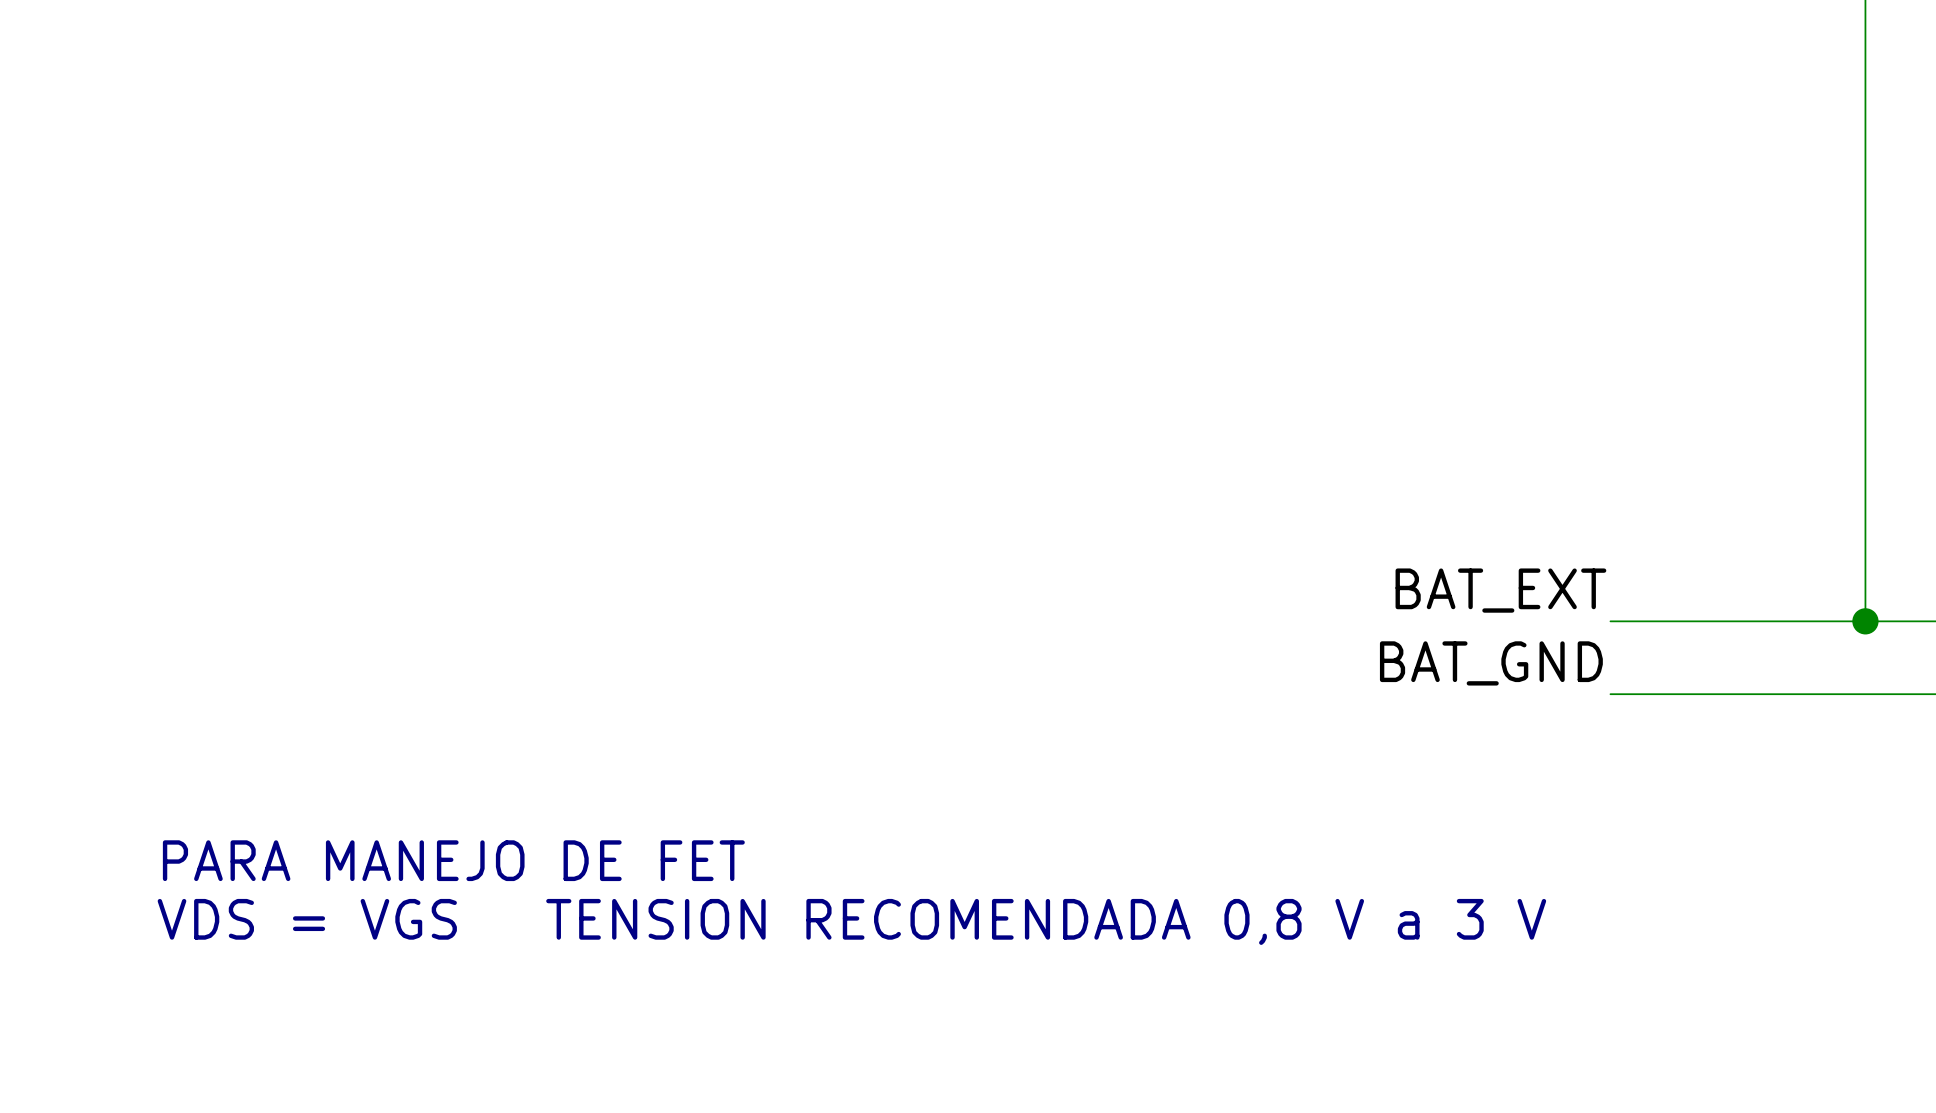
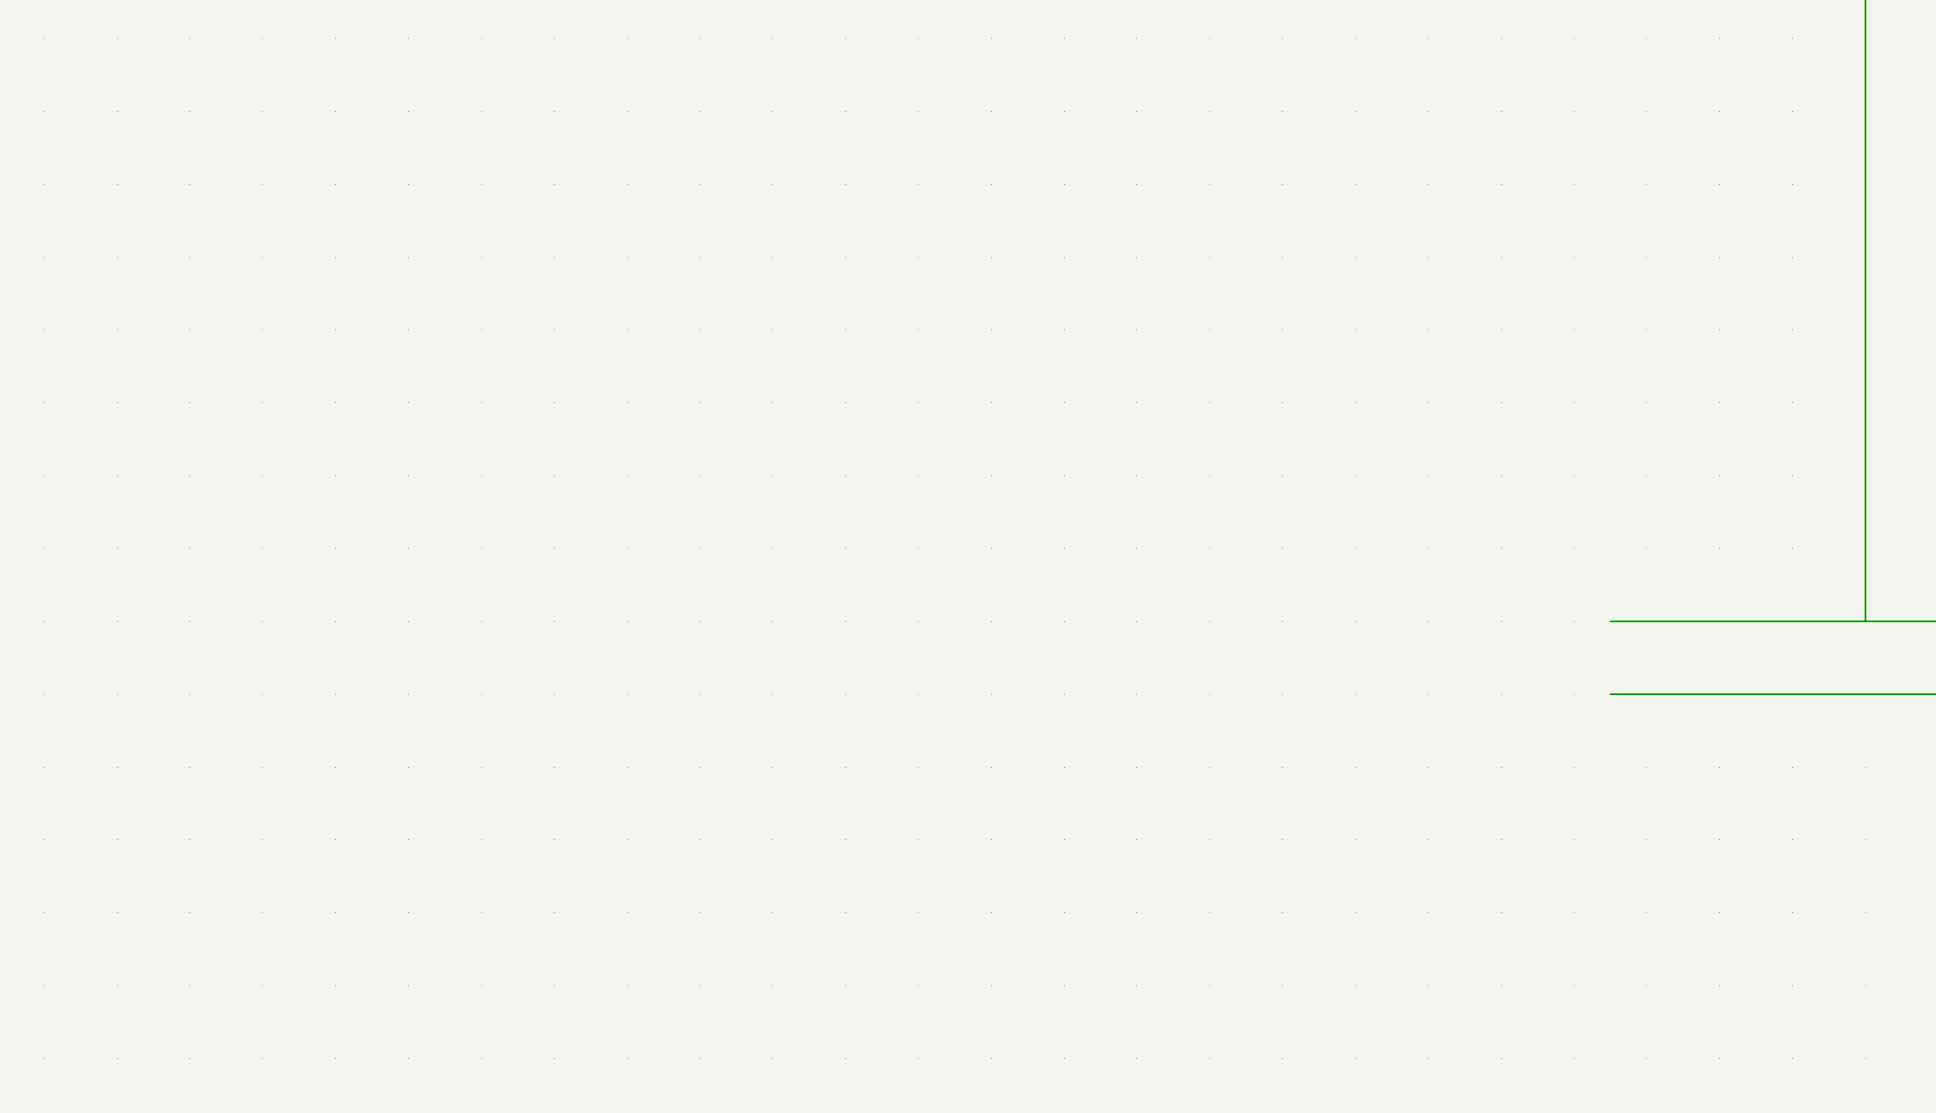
label: BAT_EXT (1500, 590) -> none
junction: (1865, 621) -> none
label: BAT_GND (1491, 663) -> none
text: PARA MANEJO DE FET (453, 860) -> none
text: VDS = VGS TENSION RECOMENDADA 0,8 V a 3 V (851, 921) -> none

